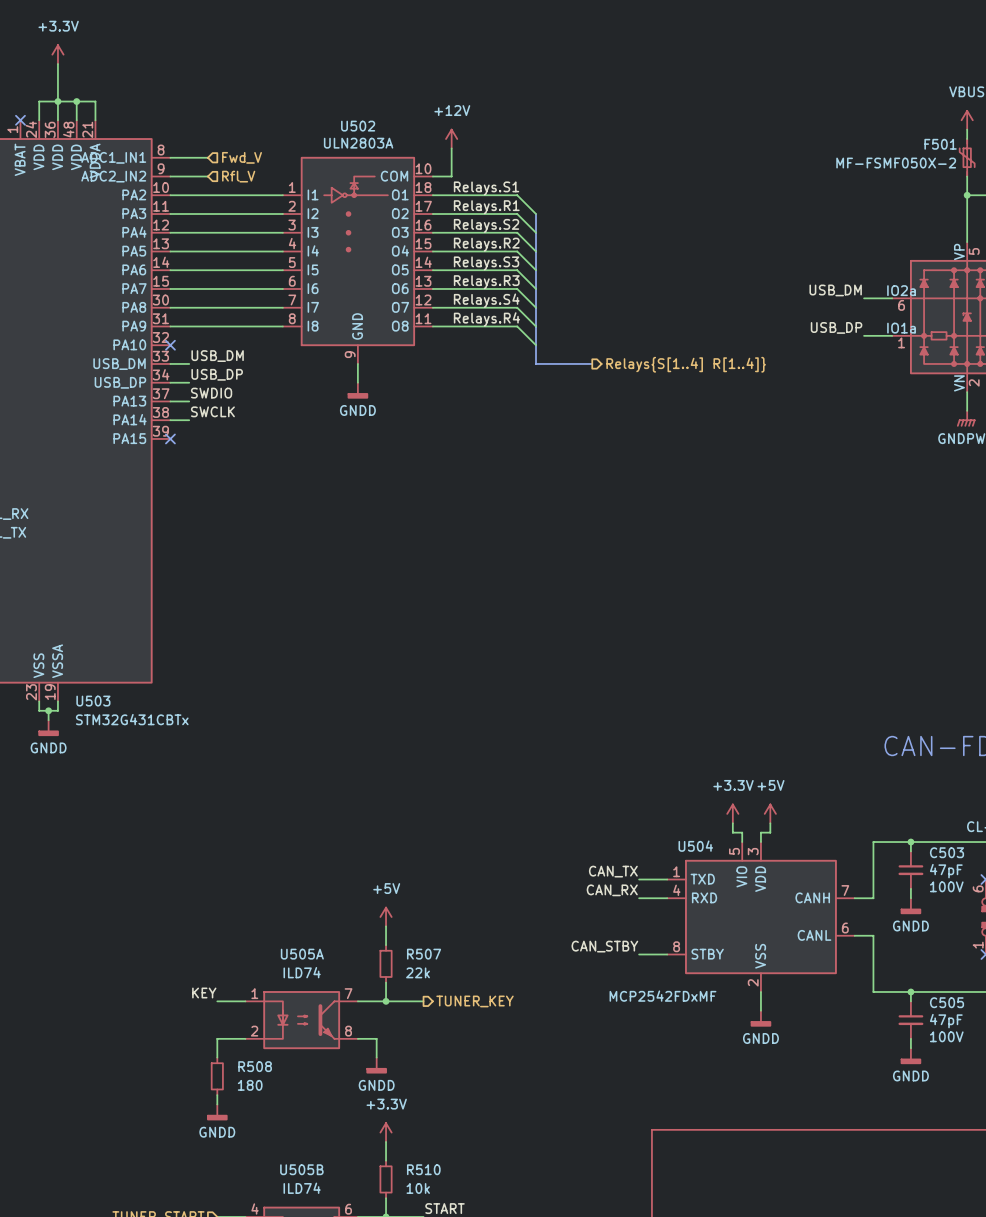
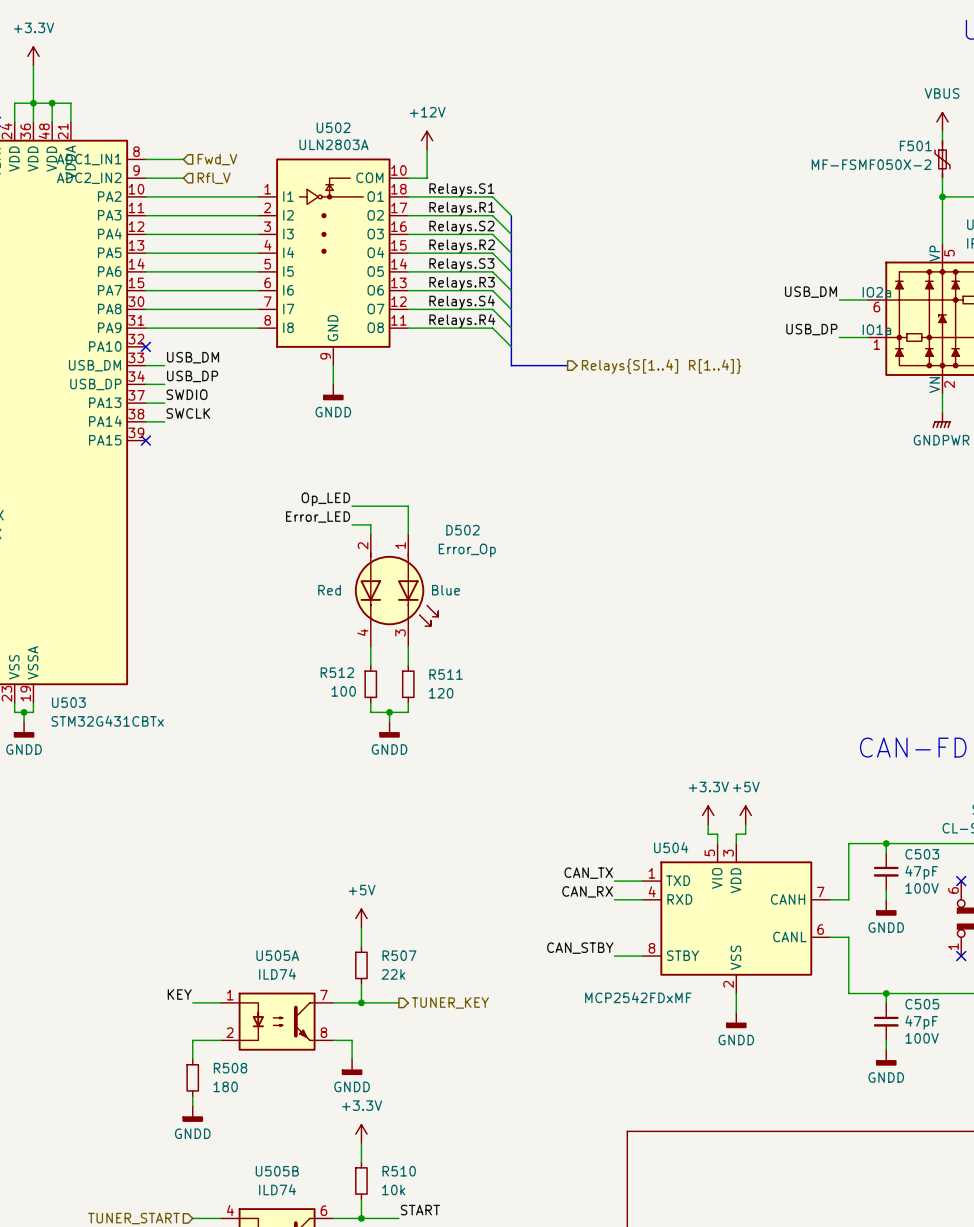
label: none -> Op_LED (325, 499)
wire: none -> (352, 506) (408, 506) (408, 534)
label: none -> Error_LED (318, 517)
wire: none -> (352, 524) (370, 524) (370, 534)
D502: none -> Error_Op (396, 590)
wire: none -> (370, 646) (370, 665)
wire: none -> (408, 646) (408, 665)
R512: none -> 100 (370, 684)
R511: none -> 120 (408, 684)
wire: none -> (370, 703) (370, 712) (408, 712) (408, 703)
wire: none -> (389, 712) (389, 721)
junction: none -> (389, 712)
power symbol: none -> GNDD (389, 729)

